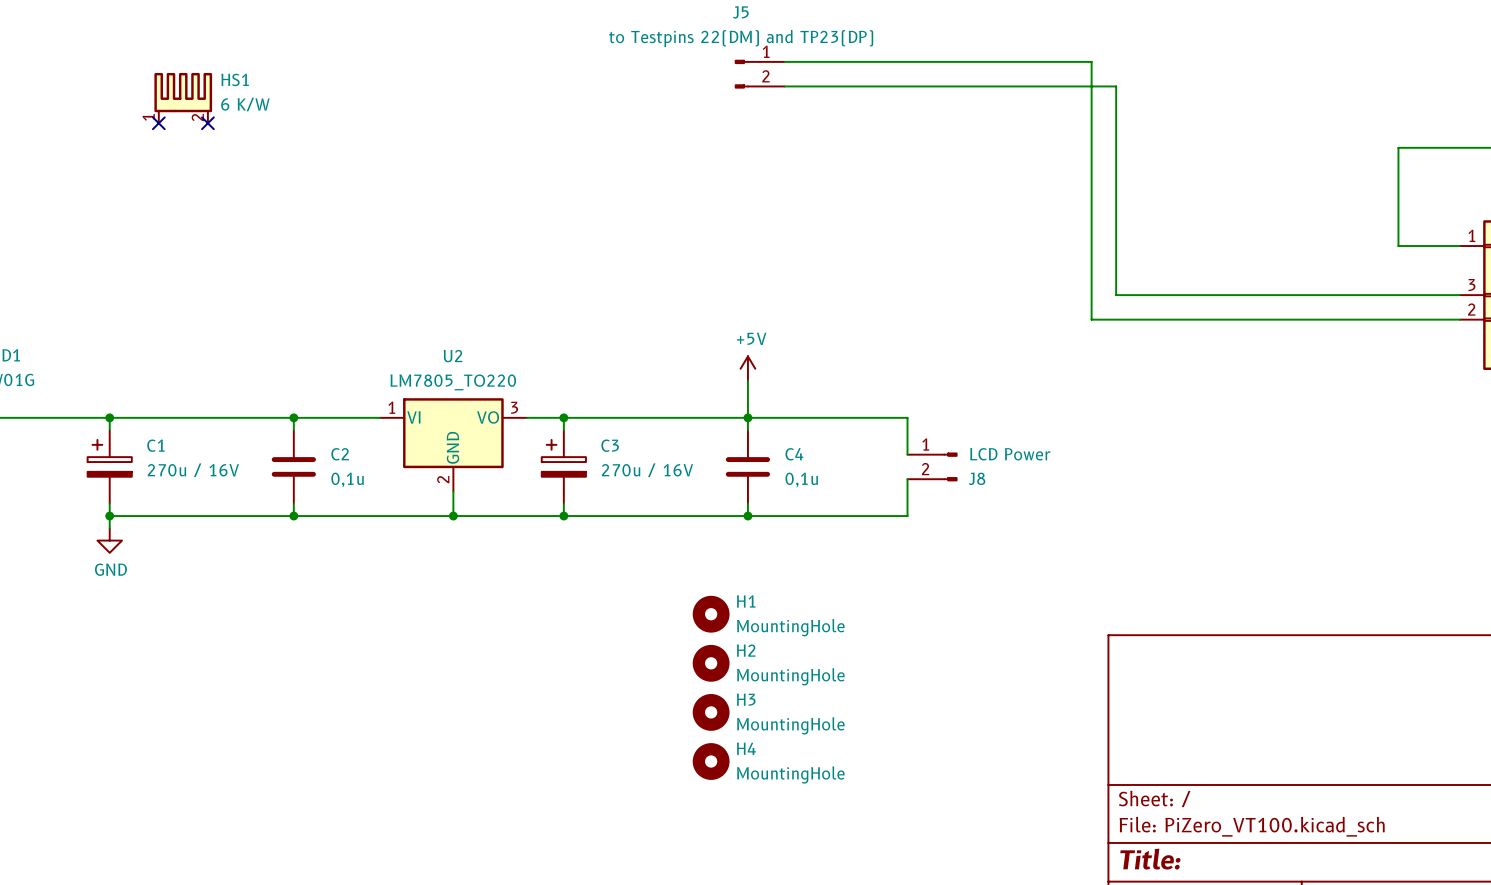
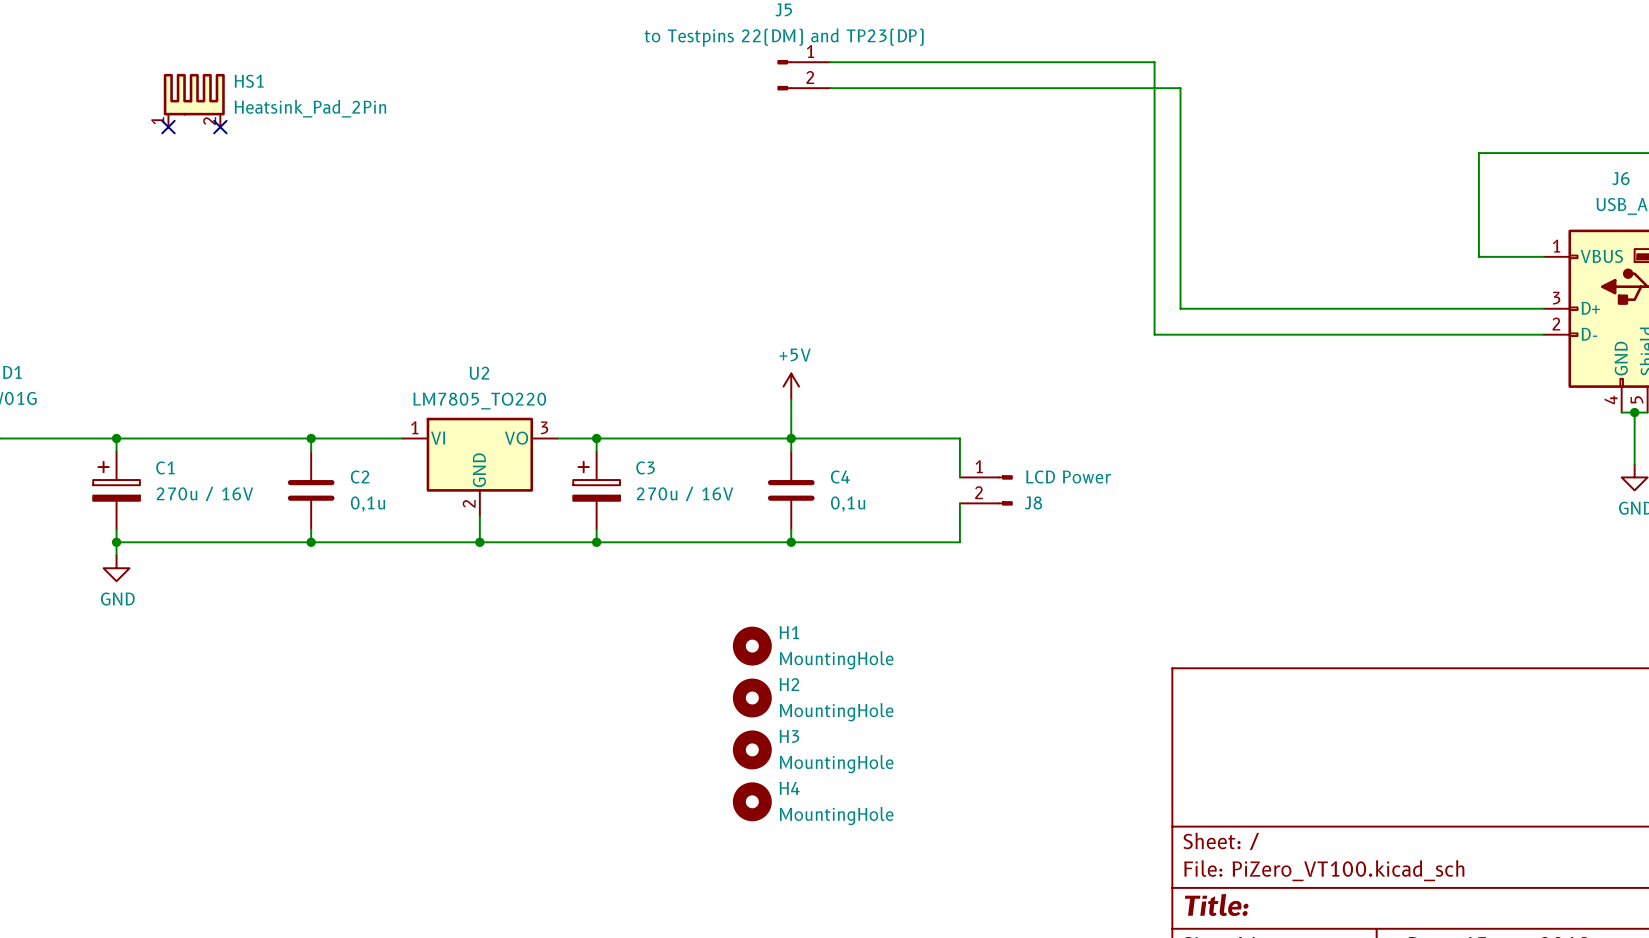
HS1 value: 6 K/W (245, 104) -> Heatsink_Pad_2Pin (310, 108)

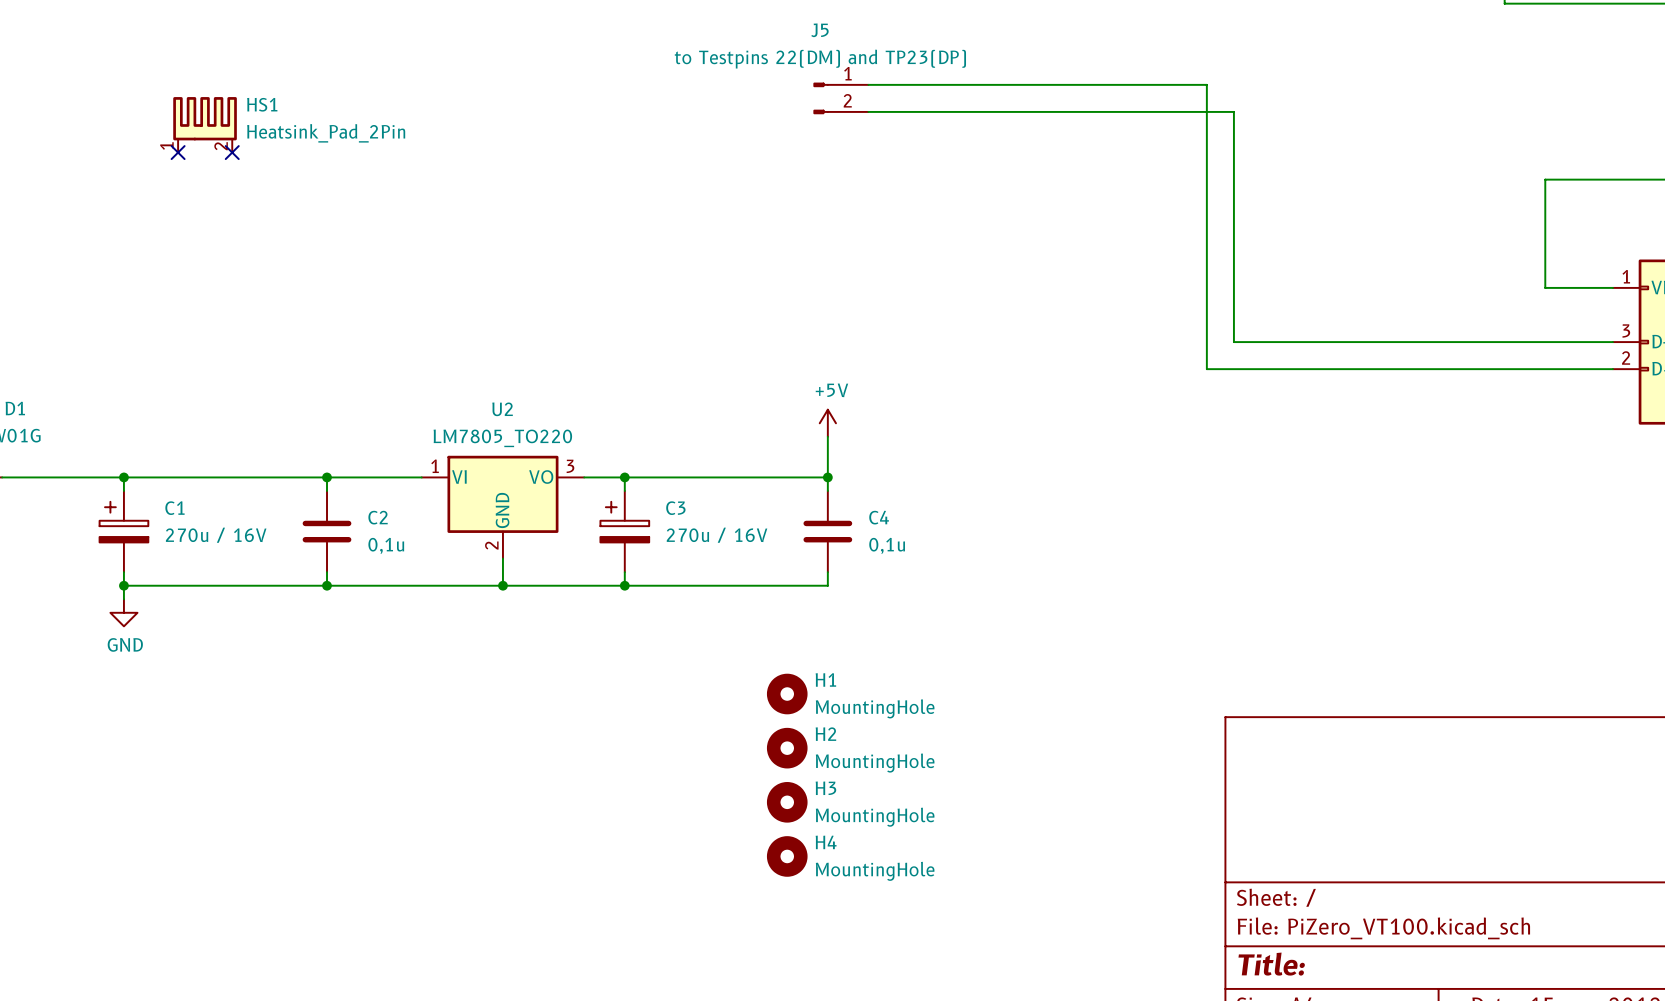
wire: (791, 438) (959, 438) (959, 477) -> none
J8: LCD Power (986, 490) -> none
wire: (959, 503) (959, 542) (791, 542) -> none
junction: (791, 542) -> none

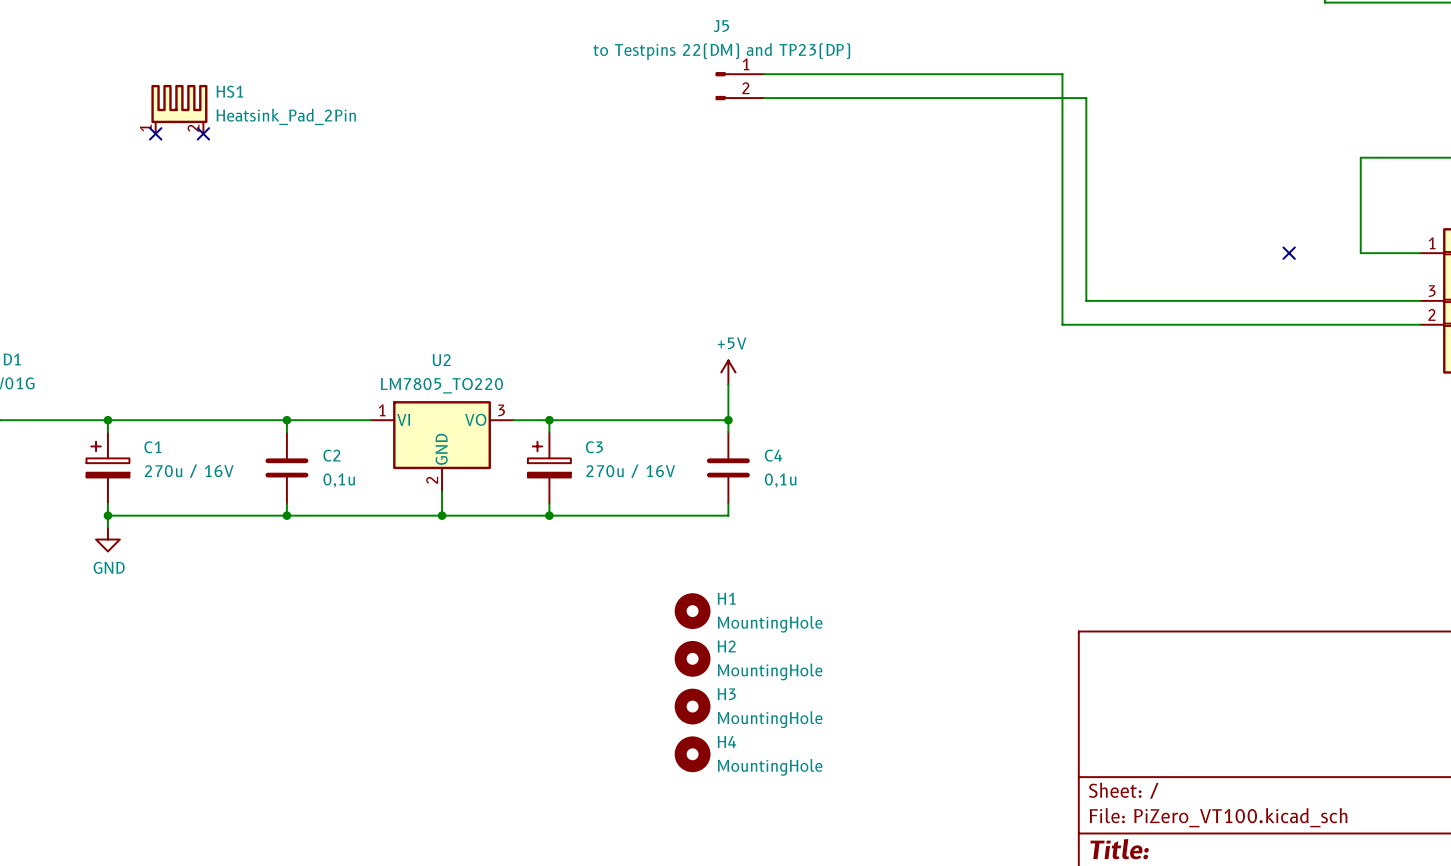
no-connect mark: none -> (1289, 253)

